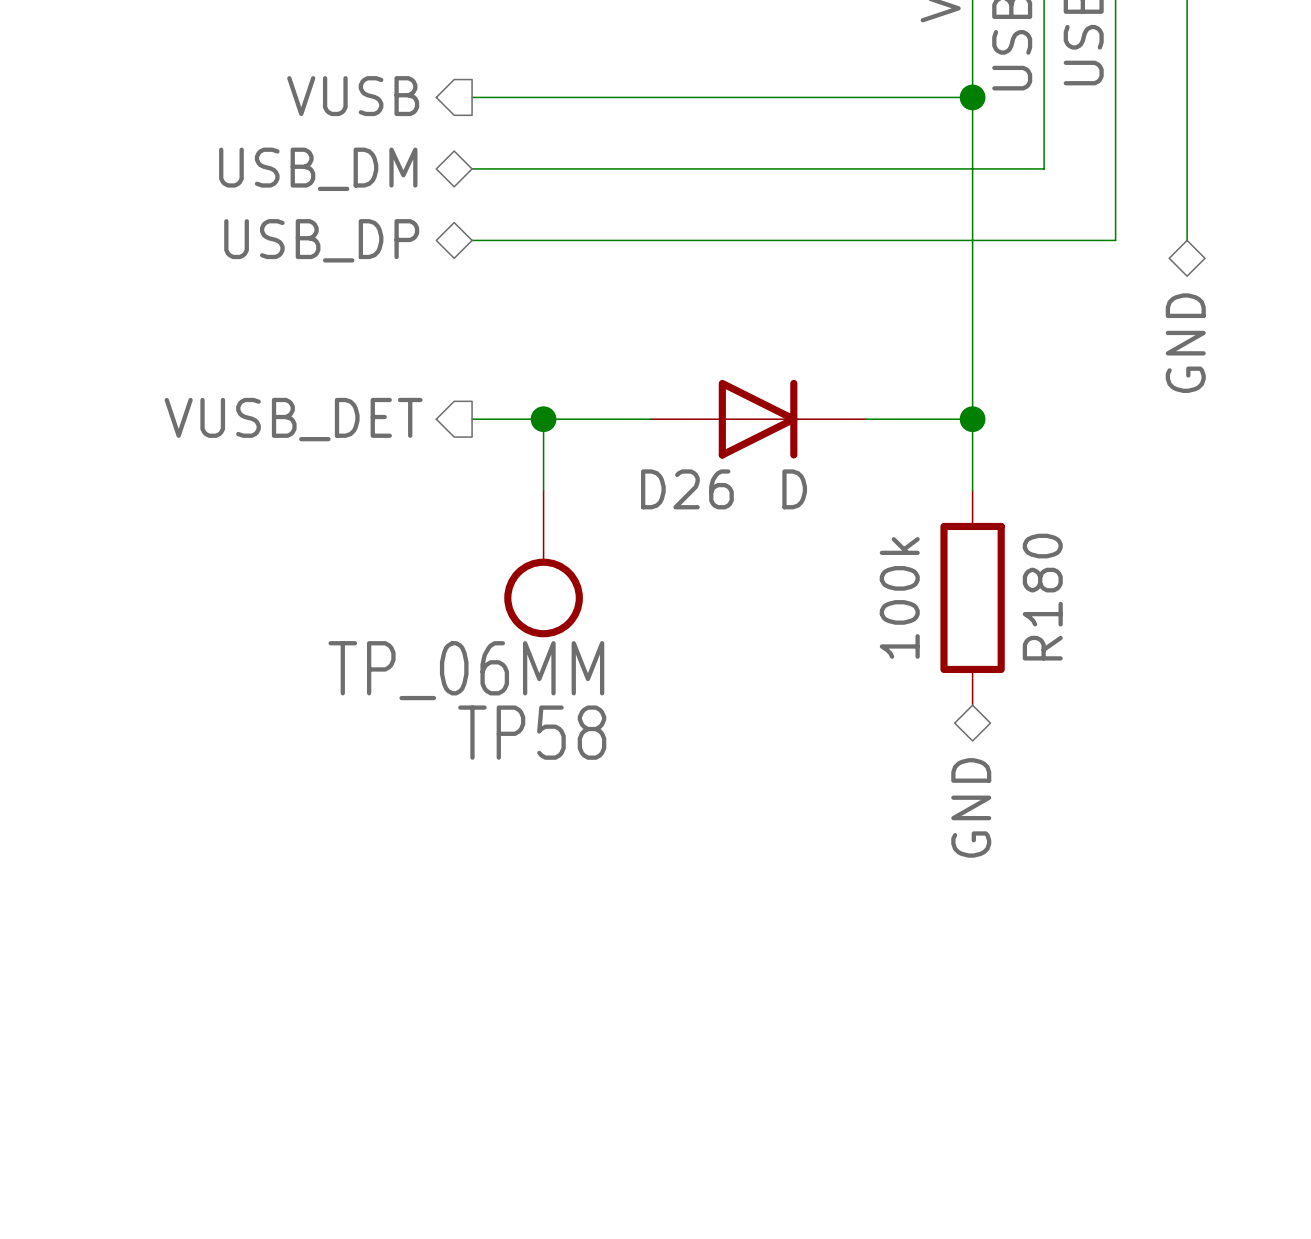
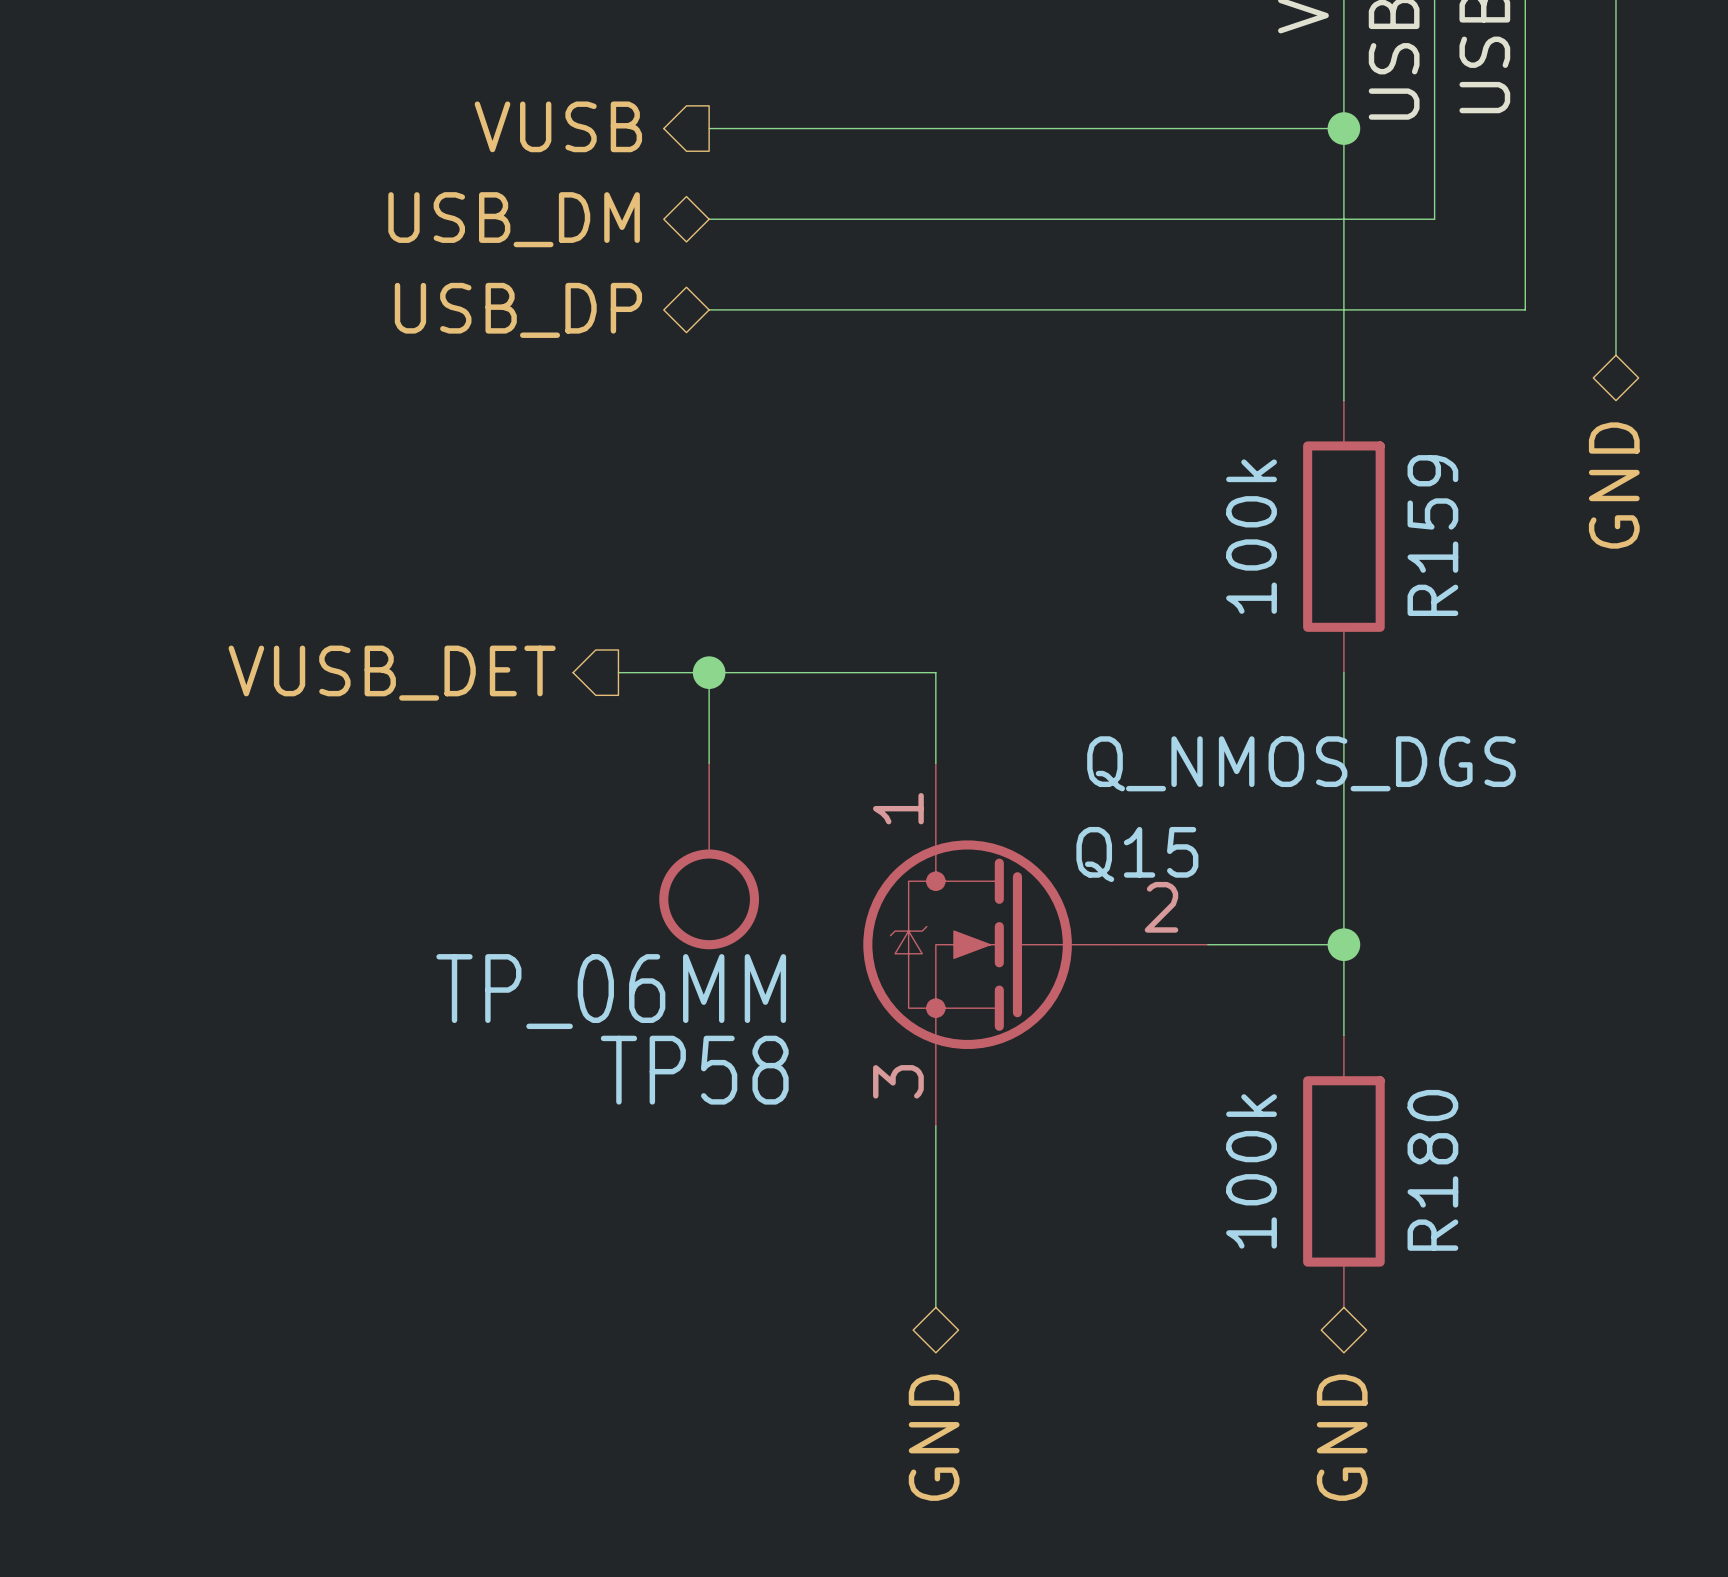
wire: none -> (1615, 309) (1615, 355)
wire: (972, 311) (972, 490) -> none
hierarchical label position: GND (1185, 343) -> GND (1614, 485)
hierarchical label position: VUSB_DET (293, 419) -> VUSB_DET (392, 673)
wire: (472, 419) (650, 419) -> none
wire: (543, 419) (543, 490) -> (709, 672) (709, 763)
junction position: (543, 419) -> (709, 672)
D26: D (758, 419) -> none
wire: (865, 419) (972, 419) -> (1207, 944) (1343, 944)
junction: (972, 419) -> none
R159: none -> 100k (1343, 536)
wire: none -> (618, 672) (935, 672) (935, 763)
wire: none -> (1343, 672) (1343, 1035)
TP58 position: (543, 563) -> (709, 856)
R180 position: (972, 597) -> (1343, 1171)
Q15: none -> Q_NMOS_DGS (1035, 944)
junction: none -> (1343, 944)
hierarchical label: GND (971, 807) -> none
wire: none -> (935, 1126) (935, 1307)
hierarchical label: none -> GND (934, 1437)
hierarchical label: none -> GND (1342, 1437)

